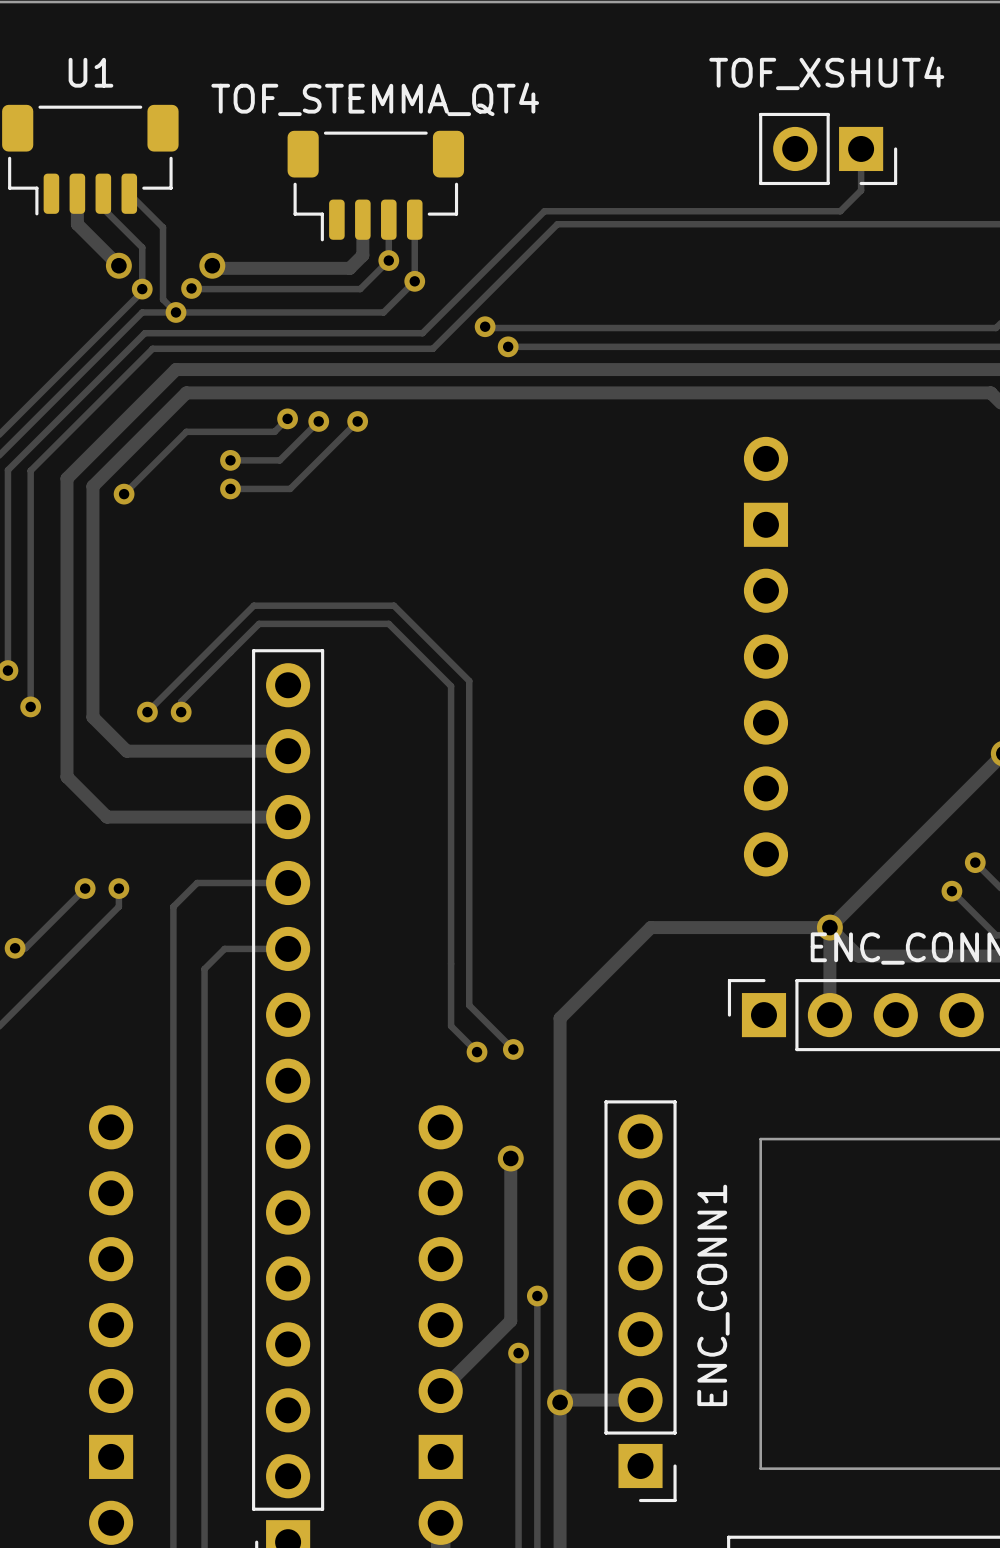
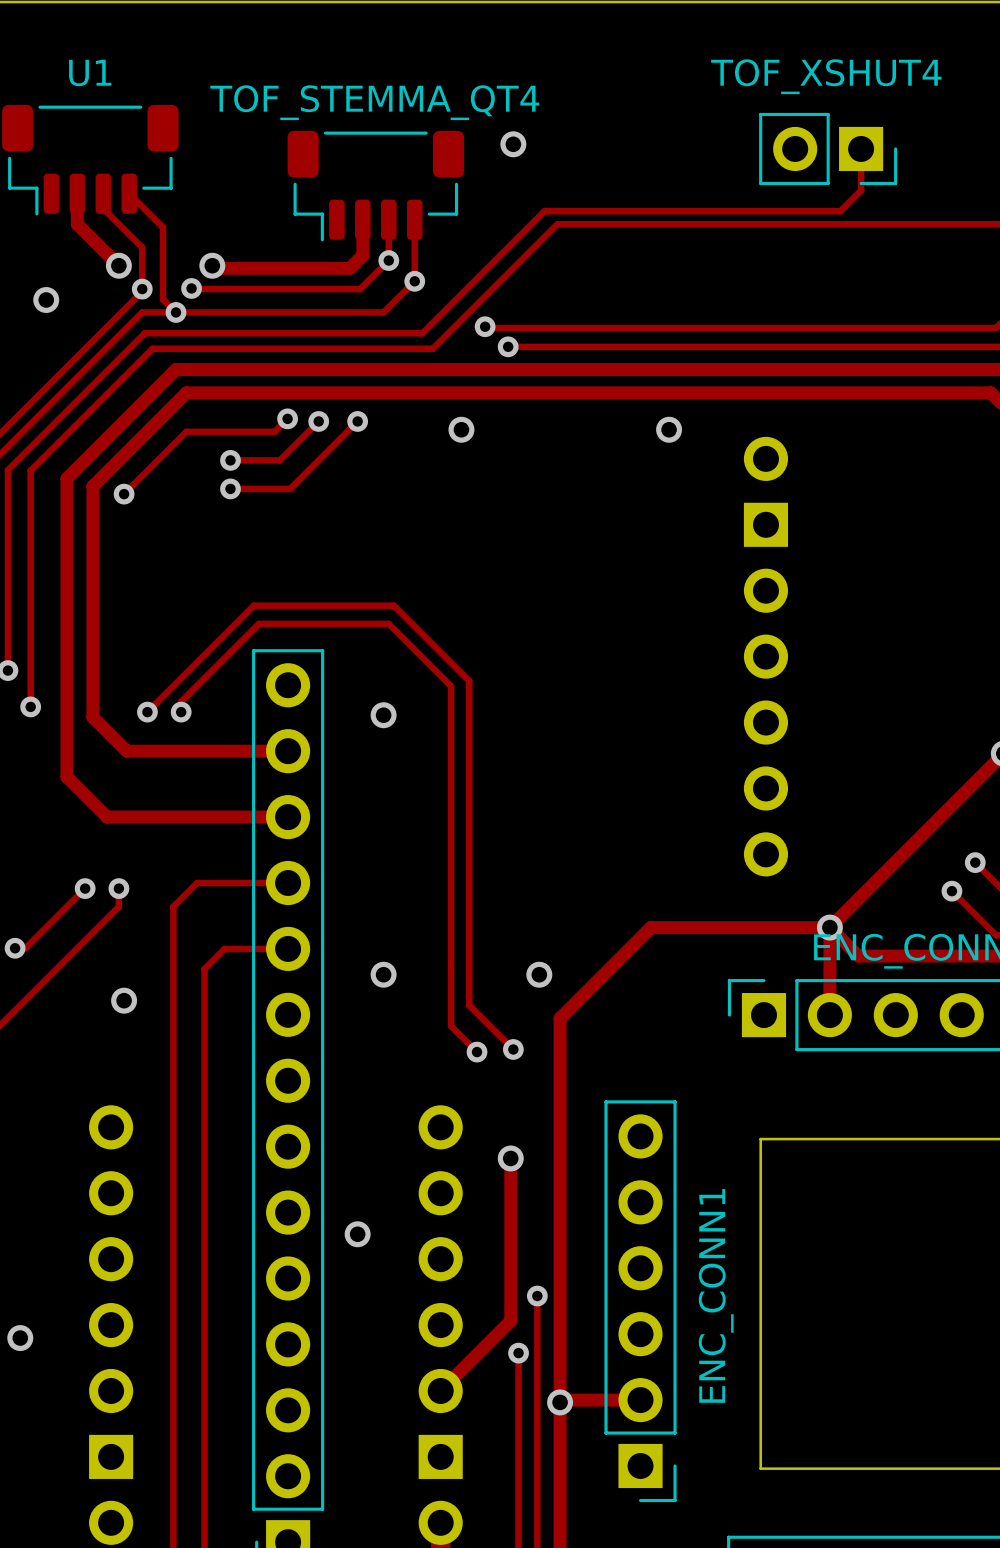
via: none -> (513, 144)
via: none -> (46, 300)
via: none -> (461, 429)
via: none -> (669, 429)
via: none -> (383, 715)
via: none -> (383, 974)
via: none -> (539, 974)
via: none -> (124, 1000)
via: none -> (357, 1234)
via: none -> (20, 1338)

